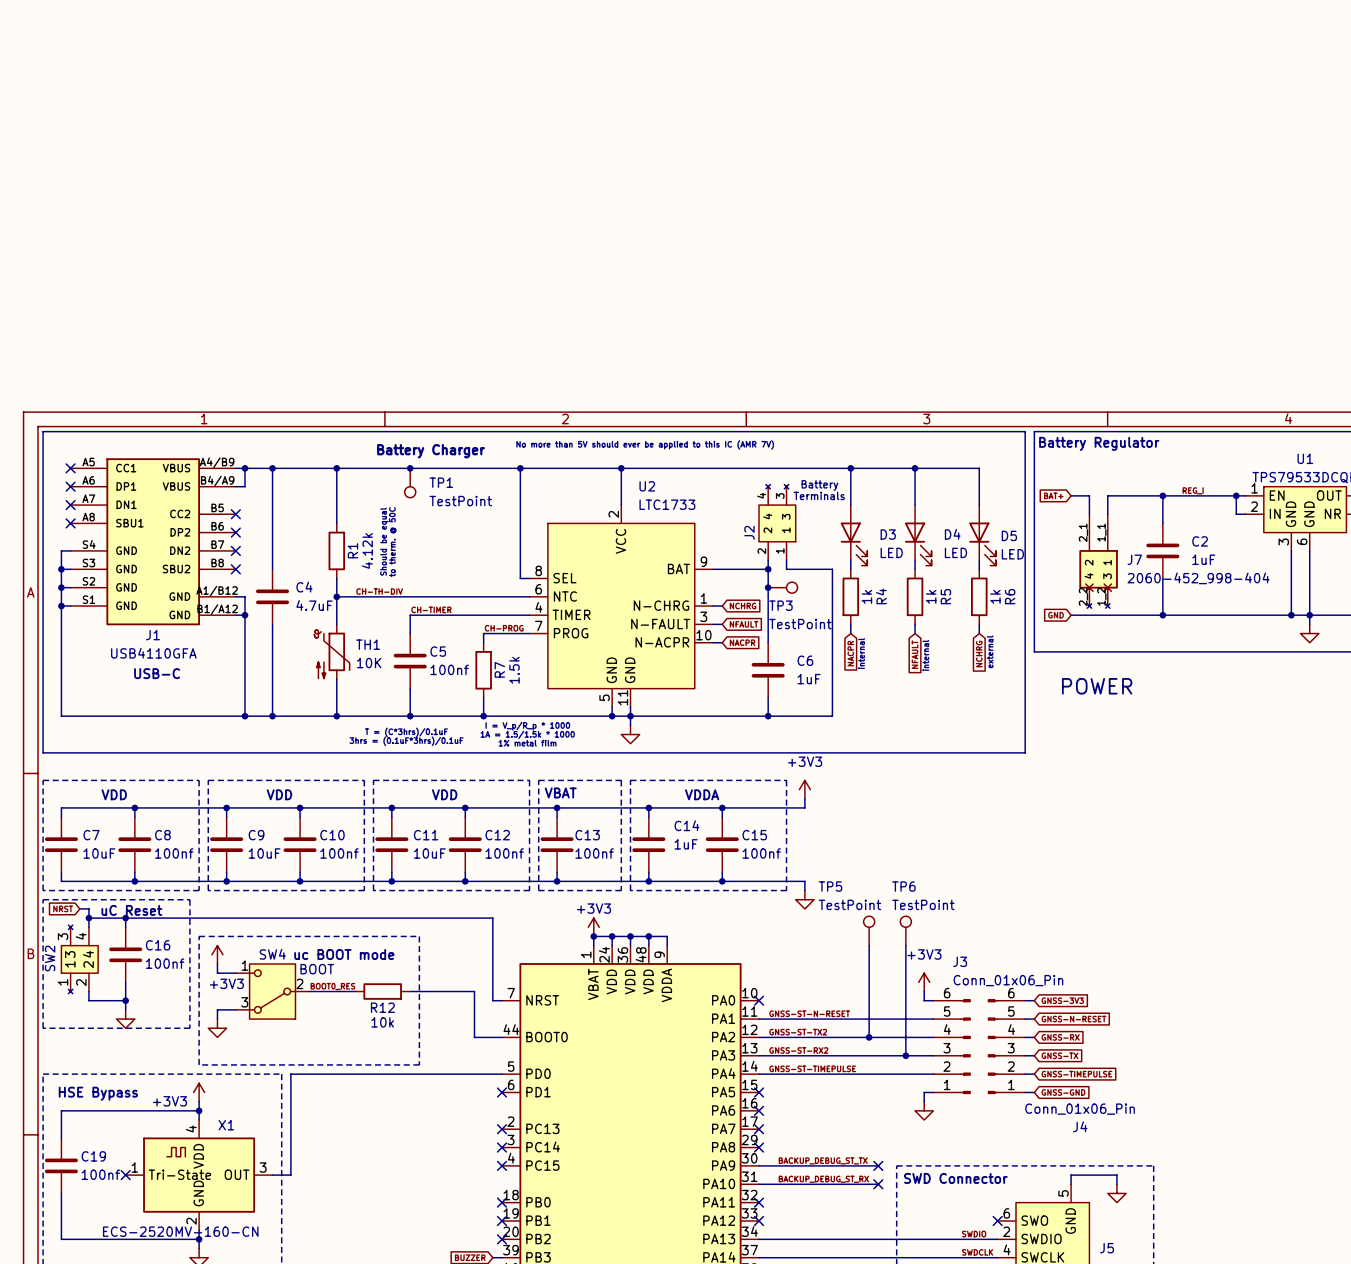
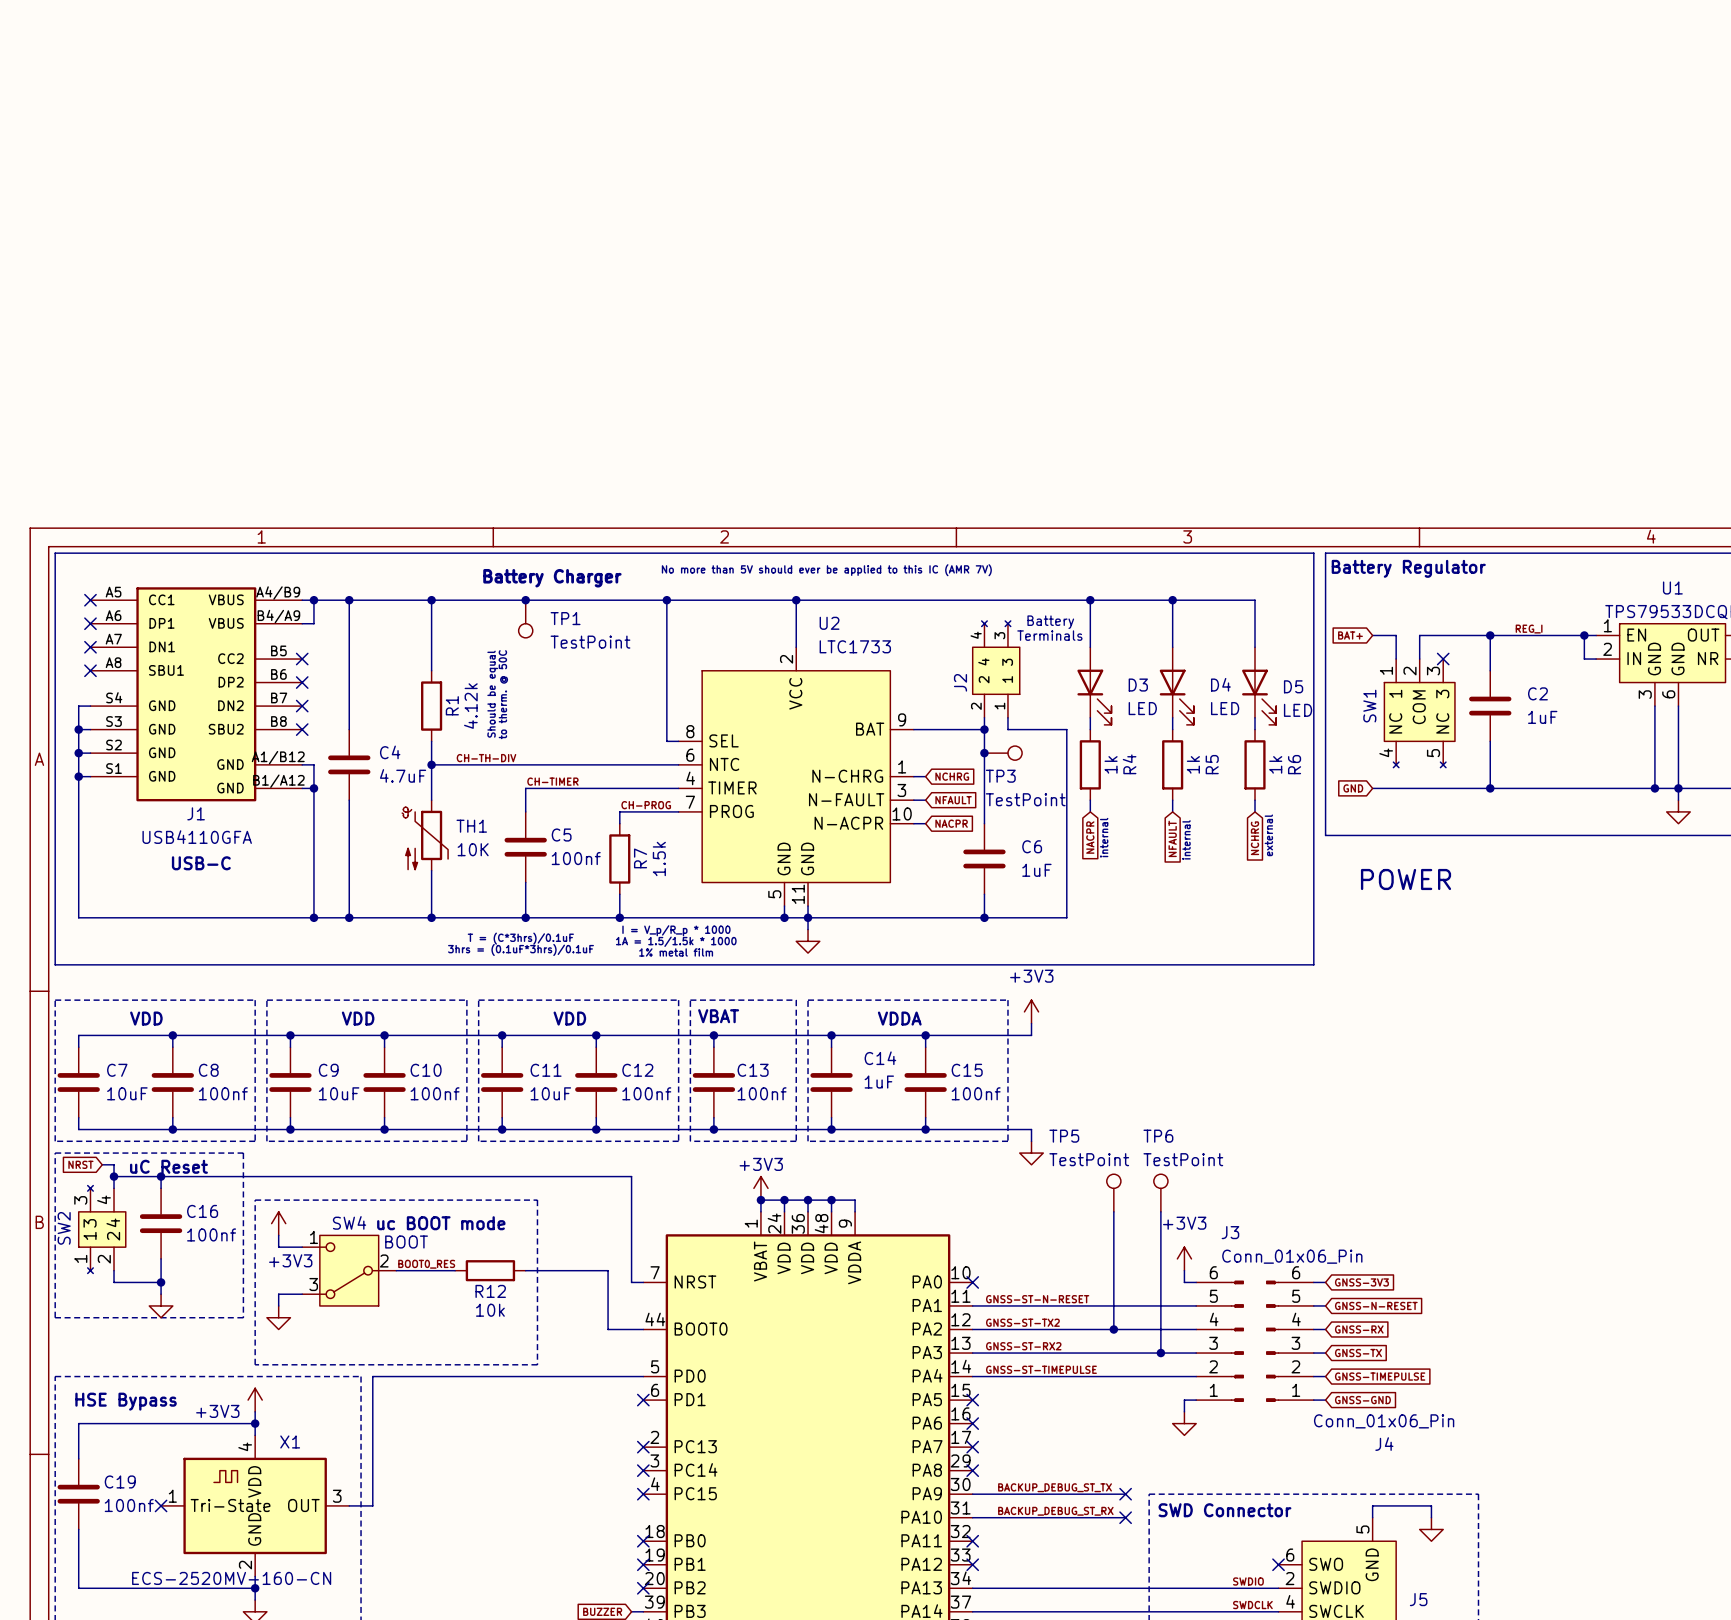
no-connect mark: none -> (1443, 659)
SW1: none -> (1419, 713)
J7: 2060-452_998-404 (1098, 561) -> none

